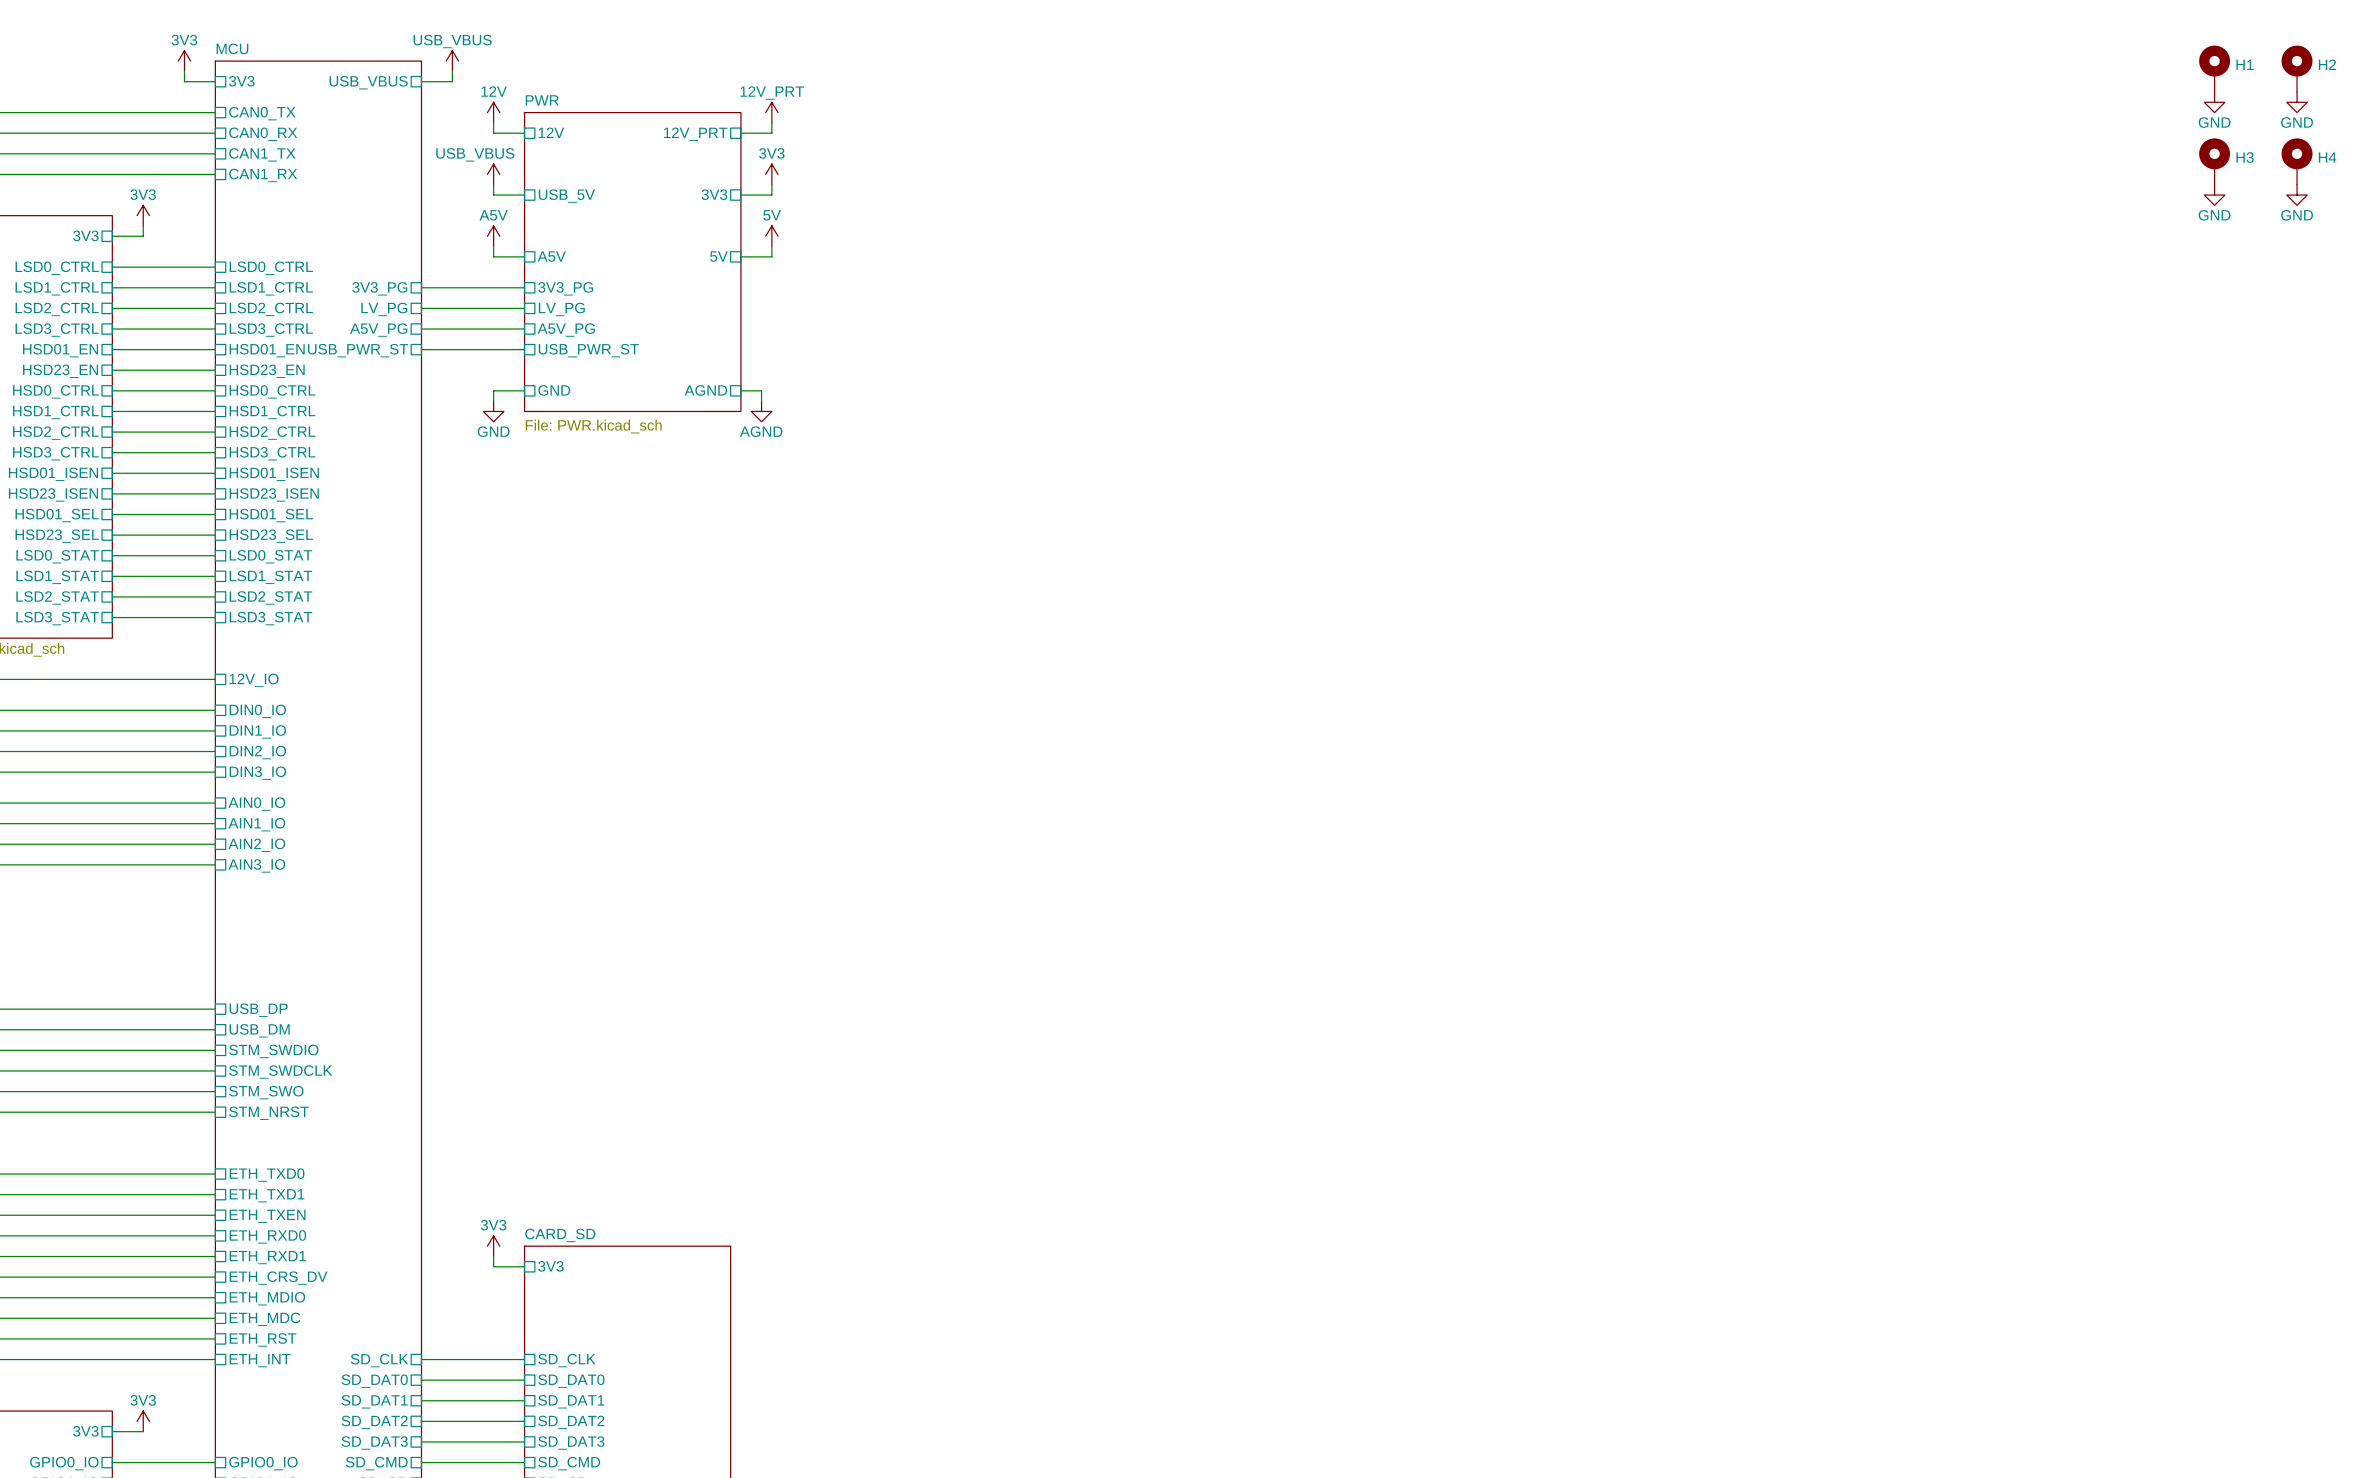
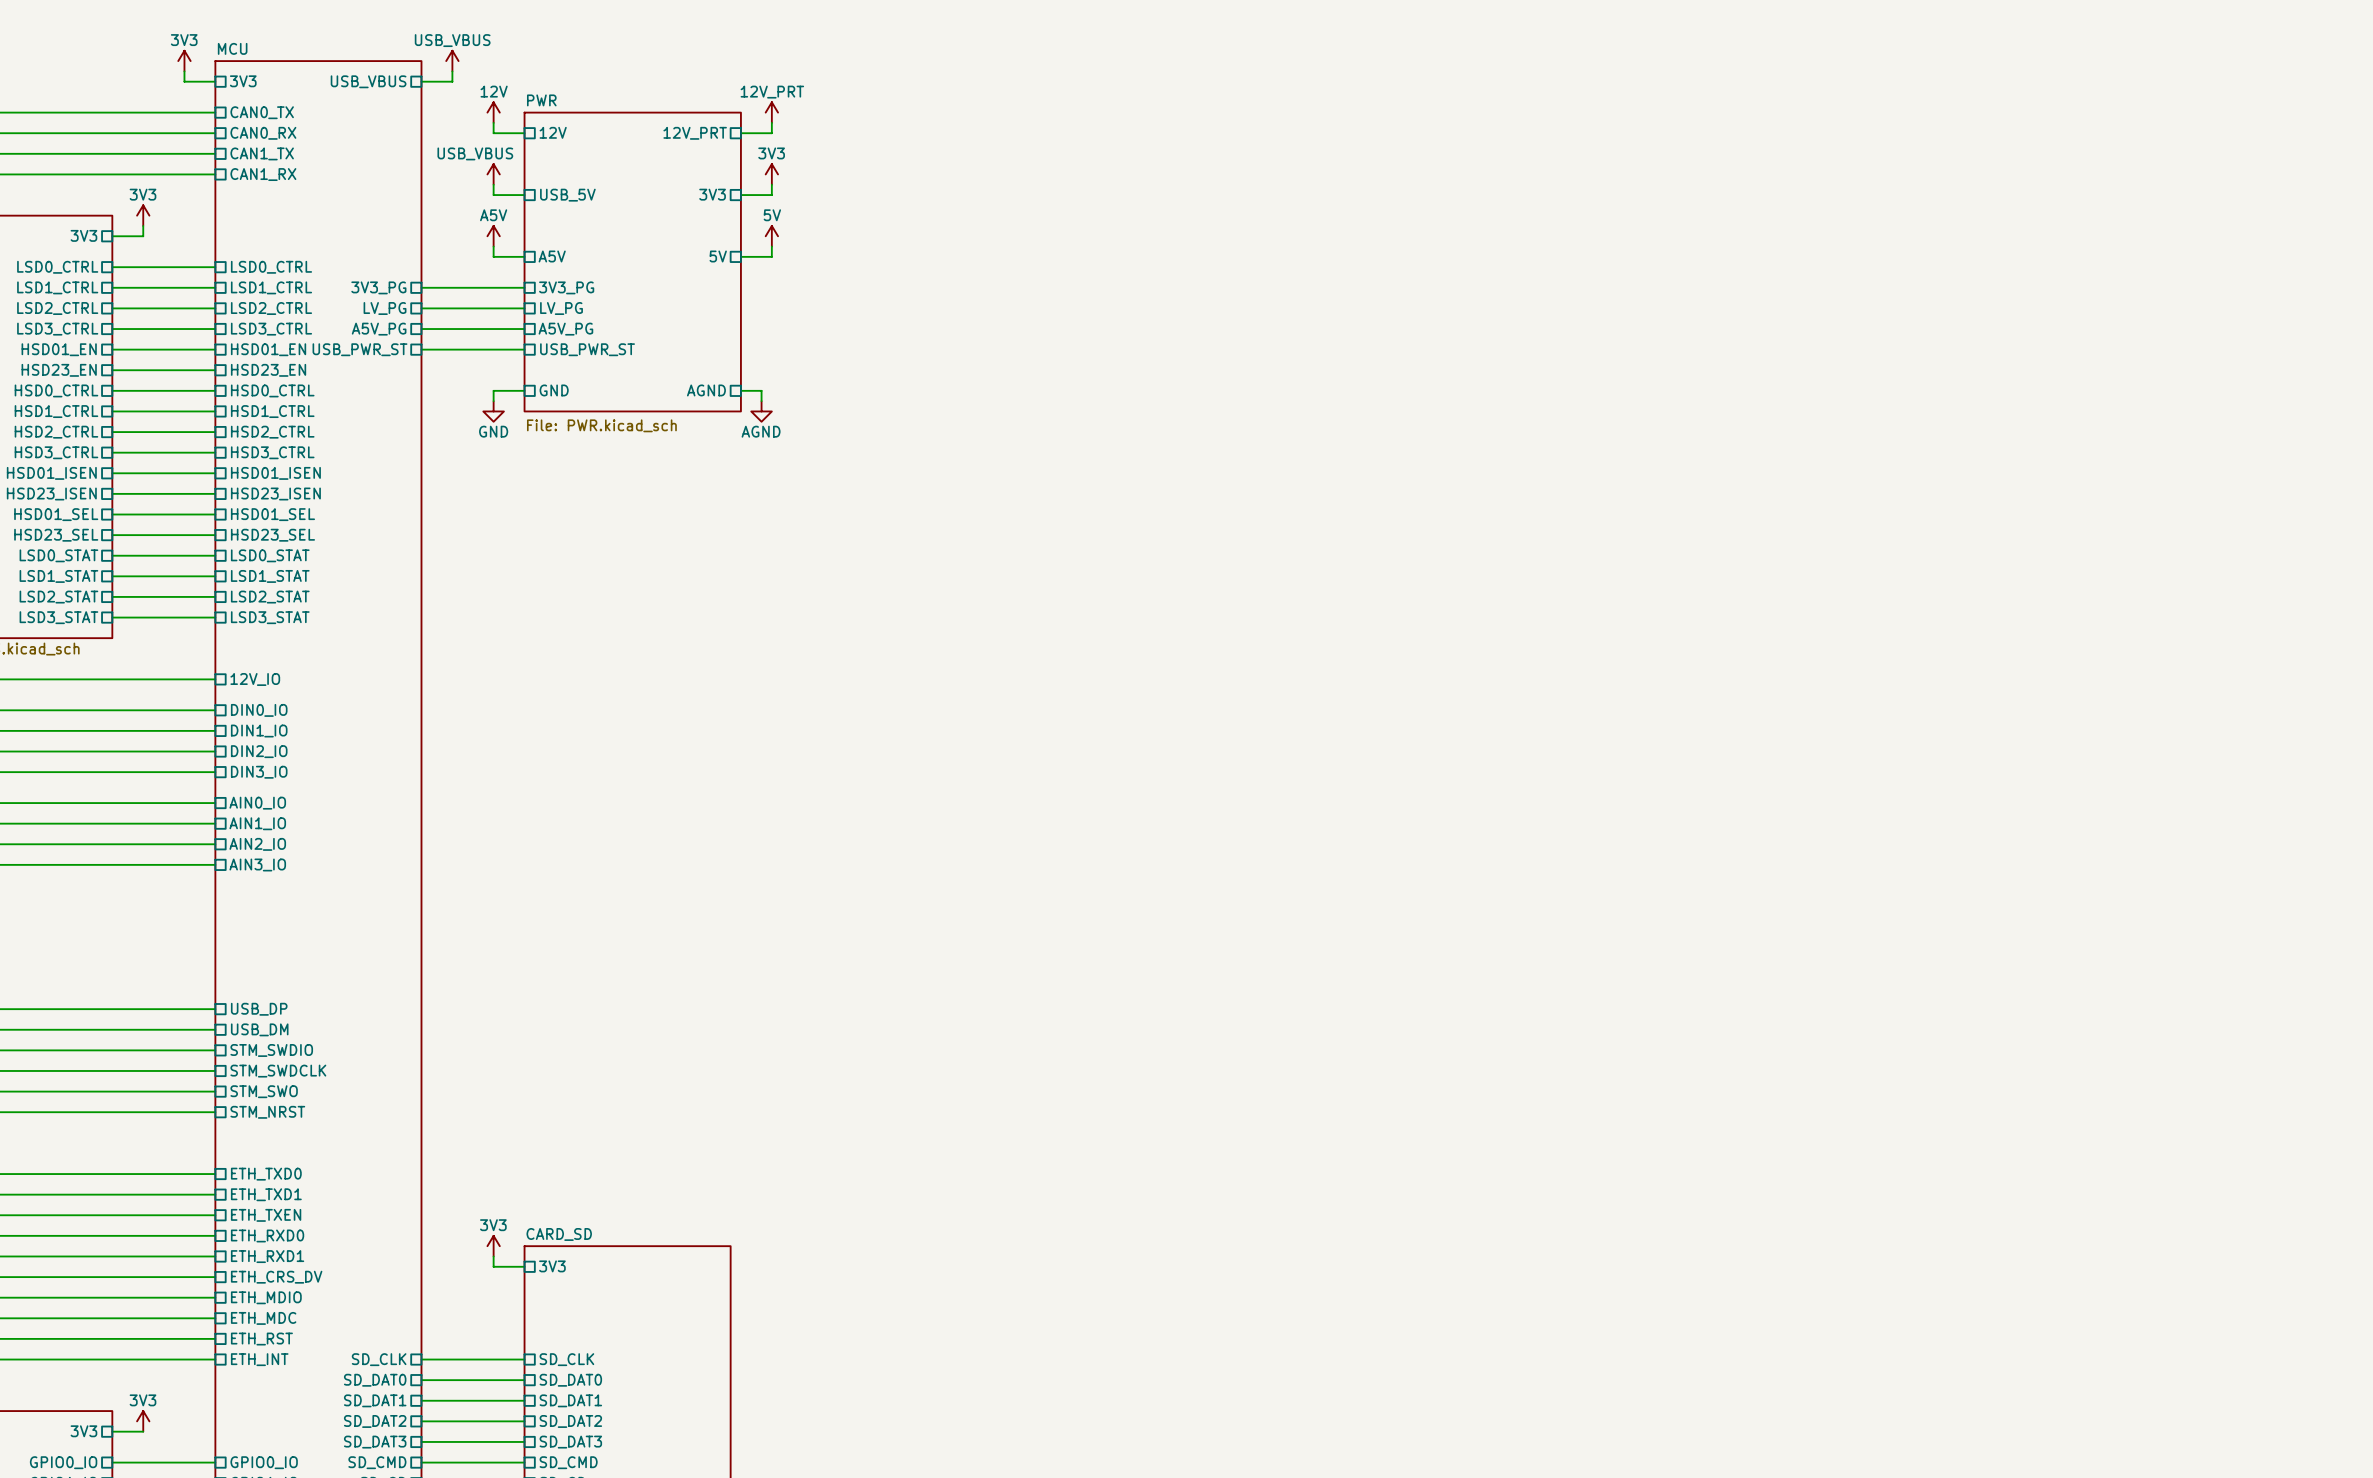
H1: (2214, 68) -> none
H2: (2297, 68) -> none
power symbol: GND (2214, 102) -> none
power symbol: GND (2297, 102) -> none
H3: (2214, 161) -> none
H4: (2297, 161) -> none
power symbol: GND (2214, 195) -> none
power symbol: GND (2297, 195) -> none

